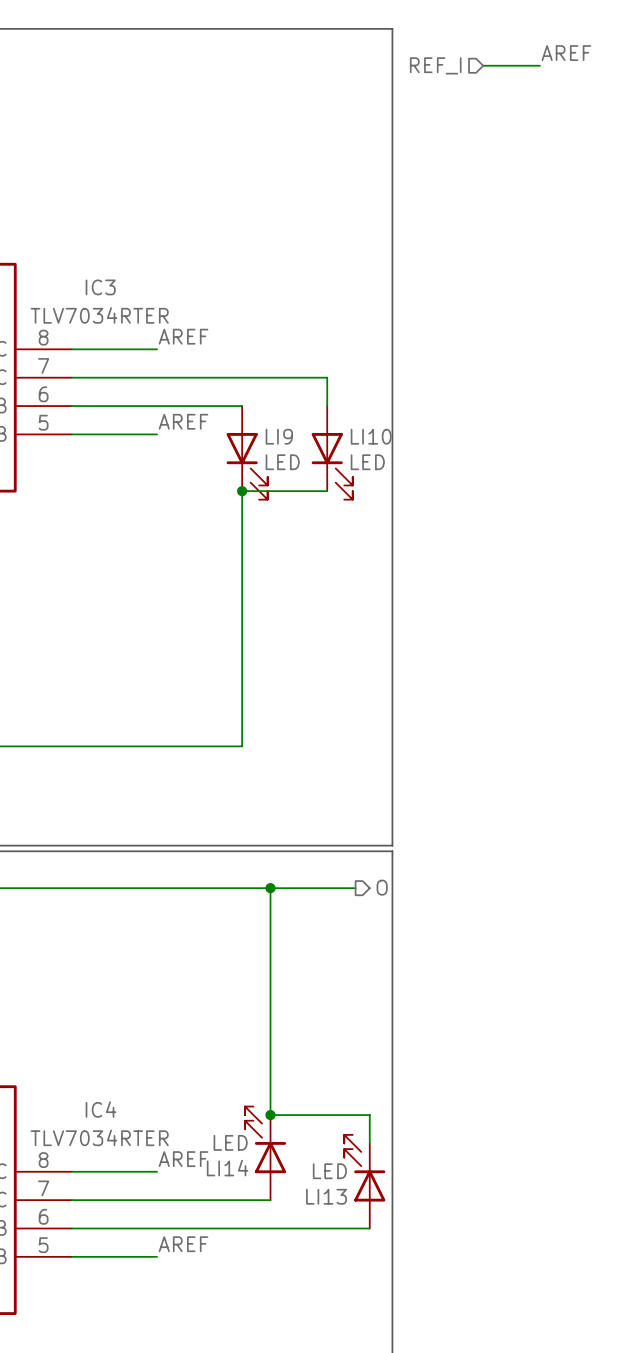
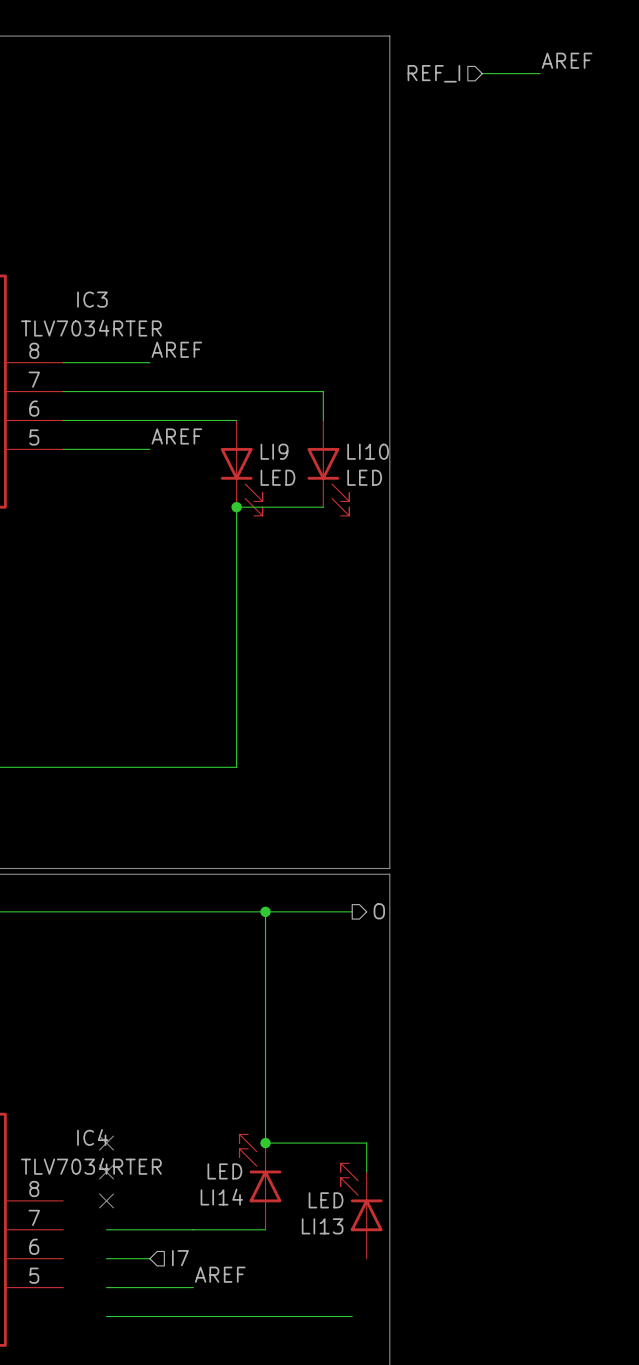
no-connect mark: none -> (106, 1143)
no-connect mark: none -> (106, 1171)
label: AREF (183, 1159) -> none
wire: (71, 1171) (157, 1171) -> none
no-connect mark: none -> (106, 1200)
wire: (71, 1200) (114, 1200) -> none
hierarchical label: none -> I7 (180, 1258)
wire: (71, 1228) (114, 1228) -> none
wire: (157, 1228) (369, 1228) -> none
label position: AREF (183, 1244) -> AREF (220, 1274)
wire: (71, 1256) (114, 1256) -> (149, 1287) (193, 1287)
wire: none -> (106, 1316) (352, 1316)

